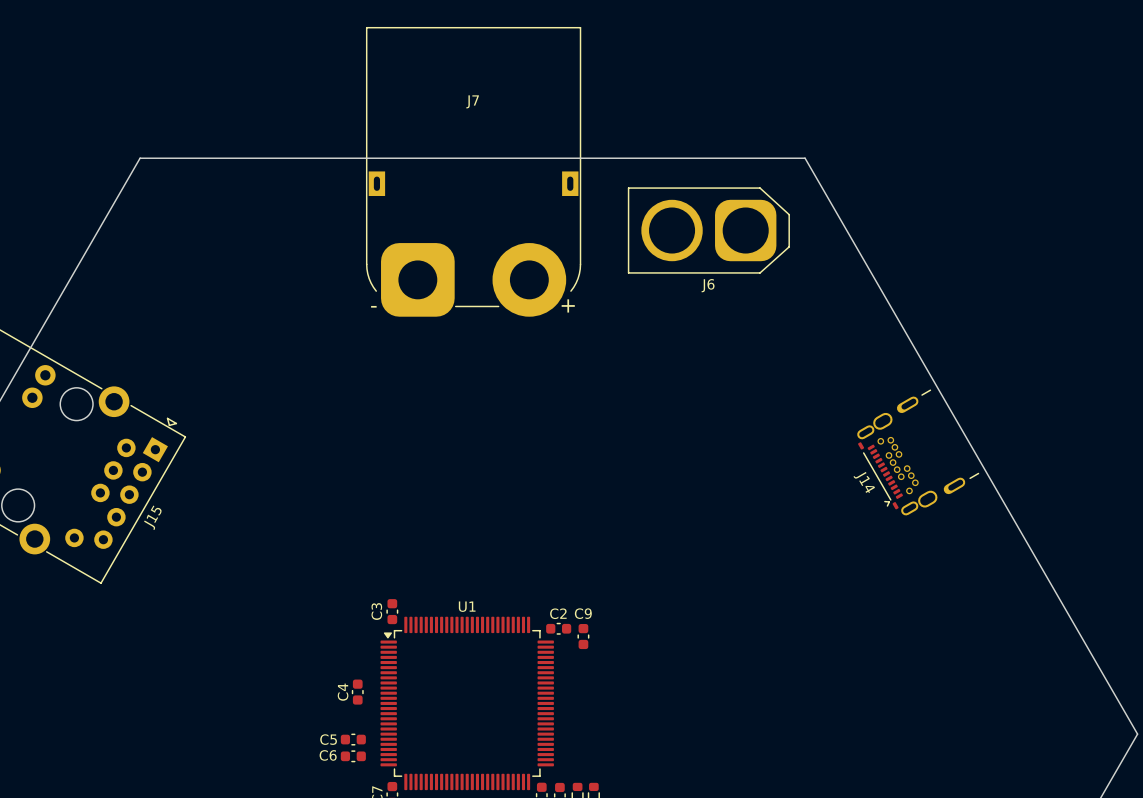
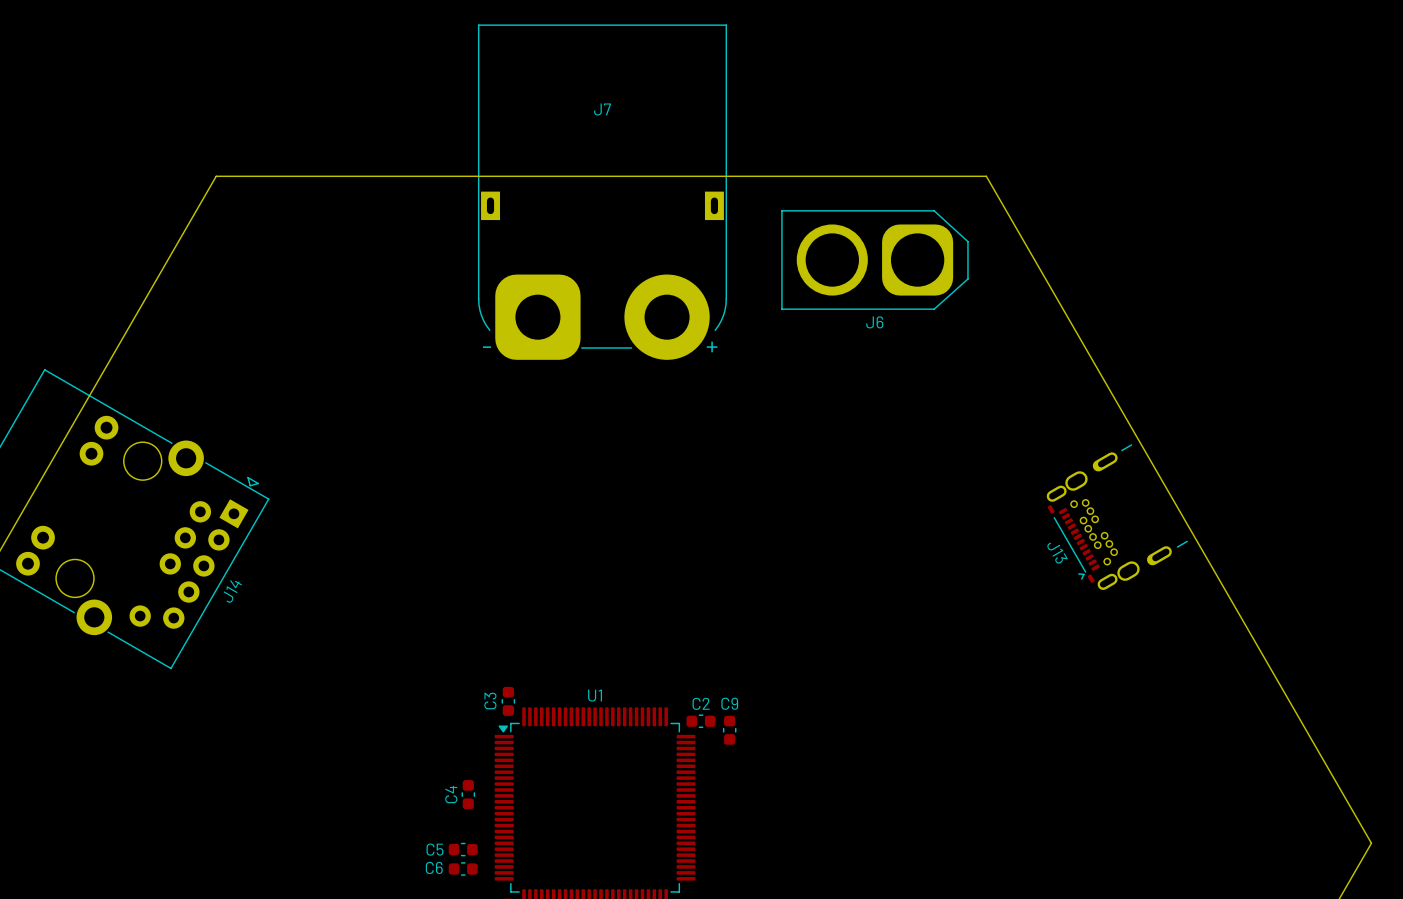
J14 name: J14 (864, 482) -> J13 (1057, 553)
J15 name: J15 (152, 517) -> J14 (232, 591)

